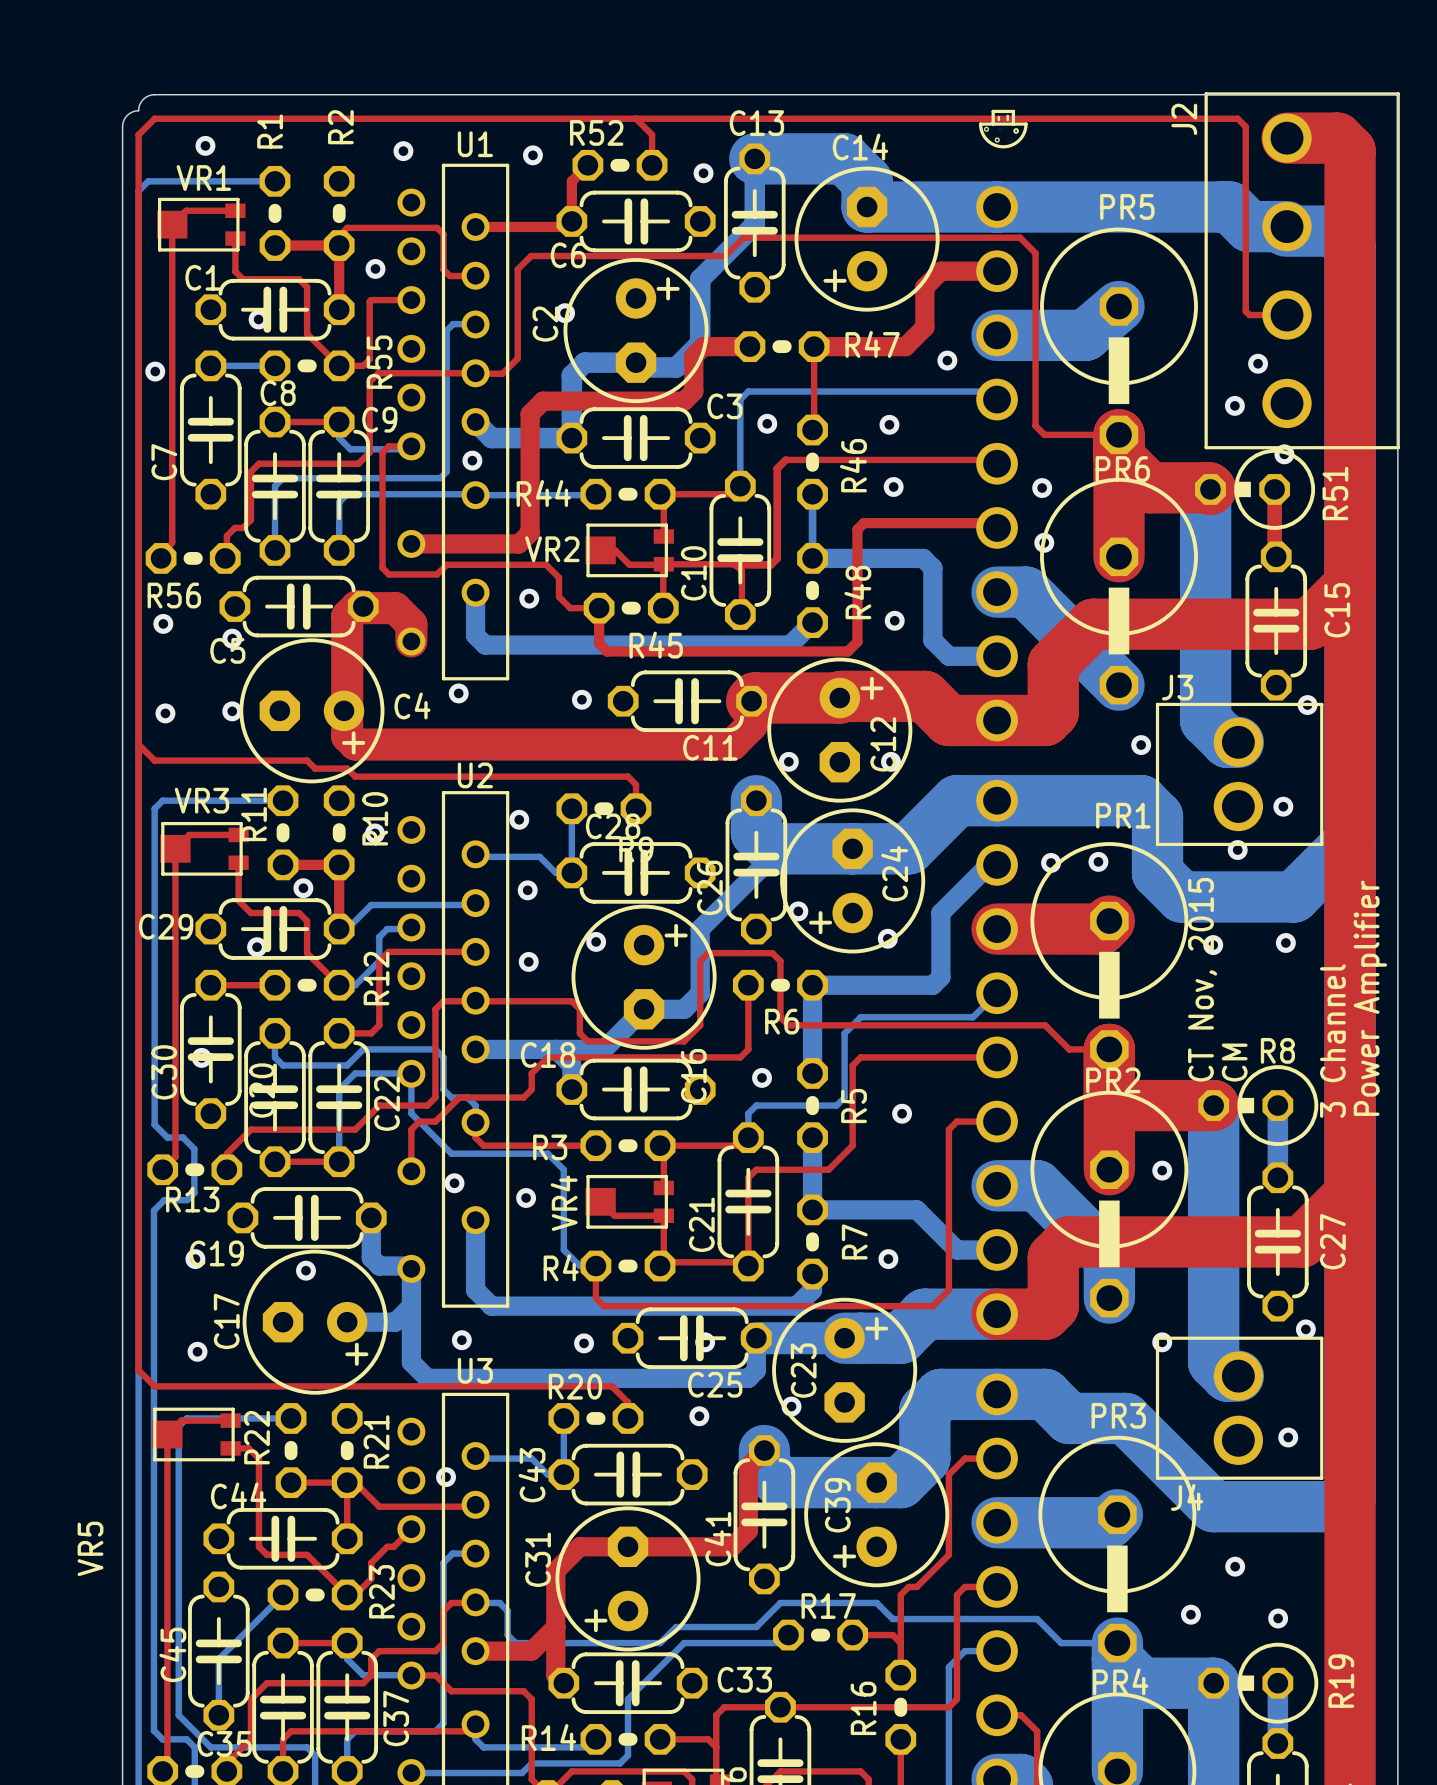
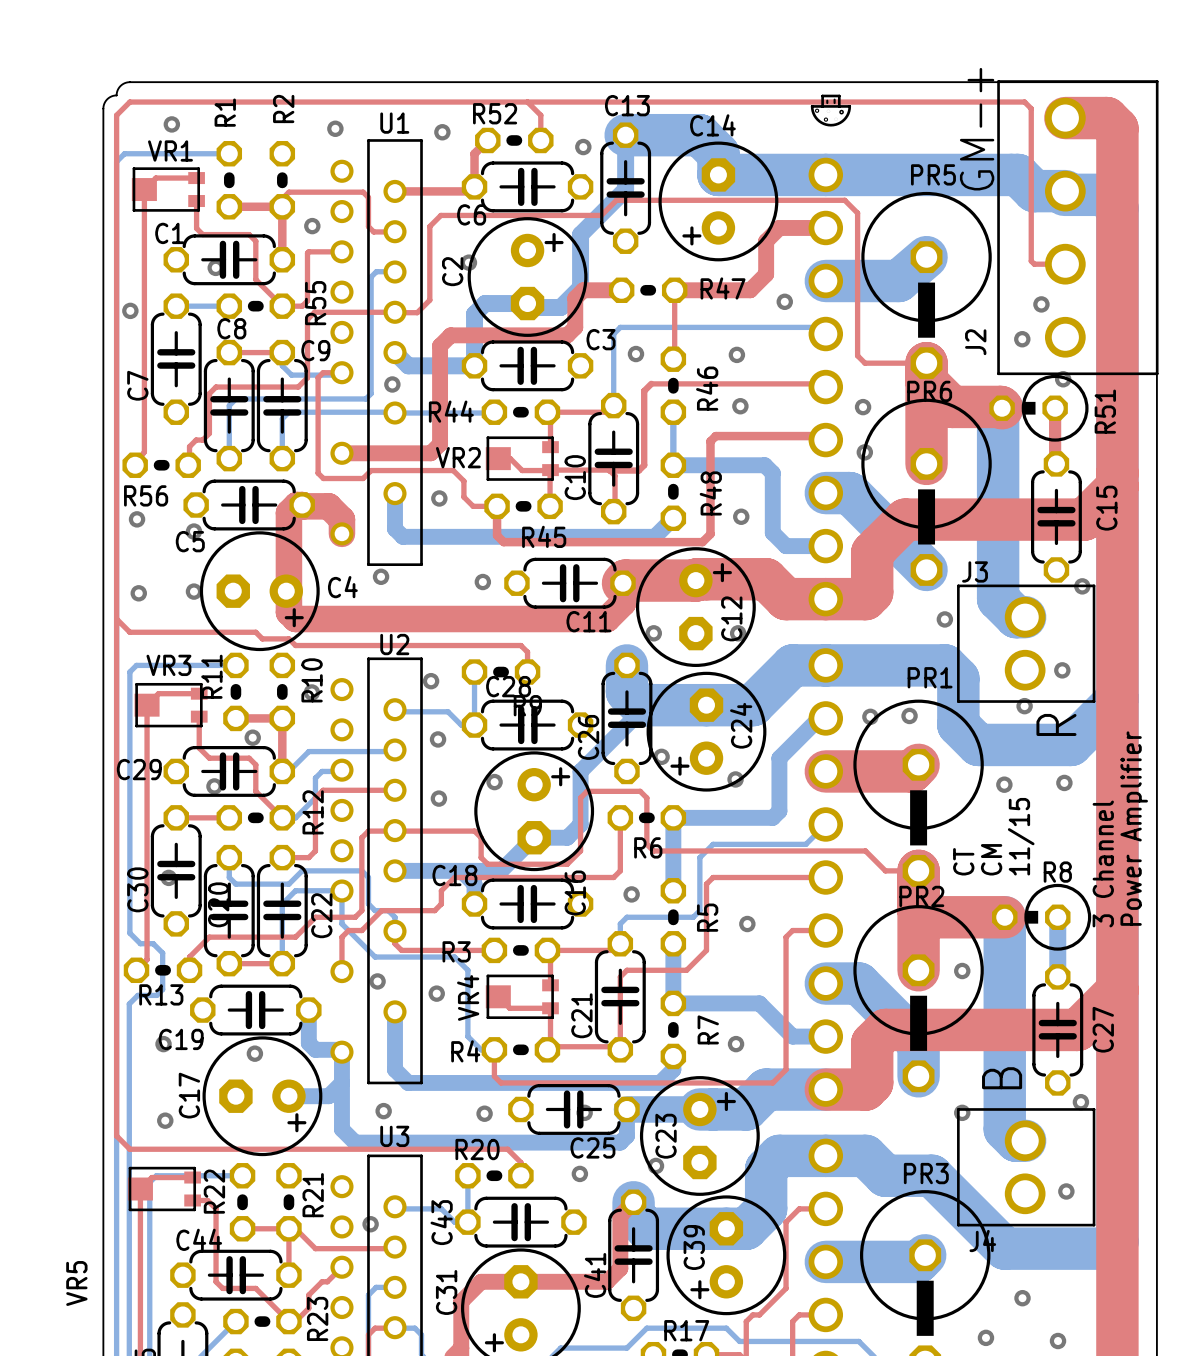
J2 name position: J2 (1184, 119) -> J2 (975, 342)
text: none -> GM-+ (977, 129)
text: none -> R (1056, 724)
text: CT Nov, 2015 (1202, 979) -> none
text: none -> 11/15 (1021, 836)
text: none -> CT (963, 861)
text position: CM (1234, 1062) -> CM (991, 859)
text: none -> B (1002, 1078)

